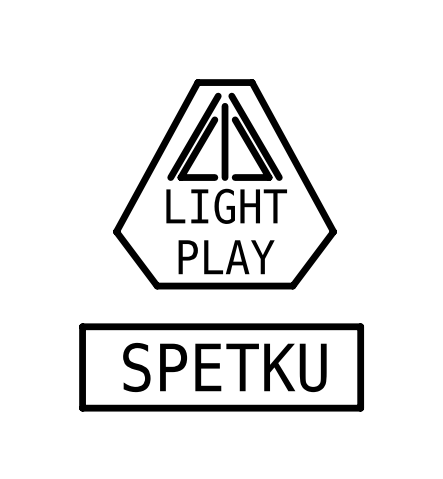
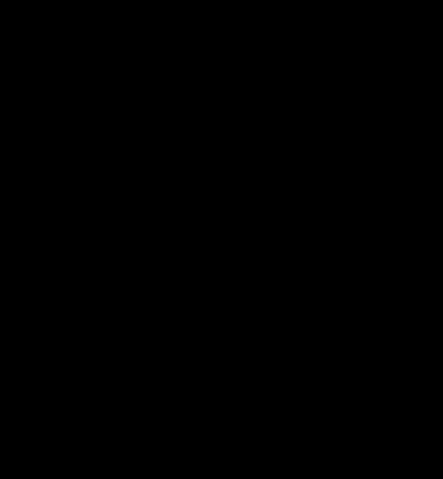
part: (225, 184) -> none
part: (221, 367) -> none

